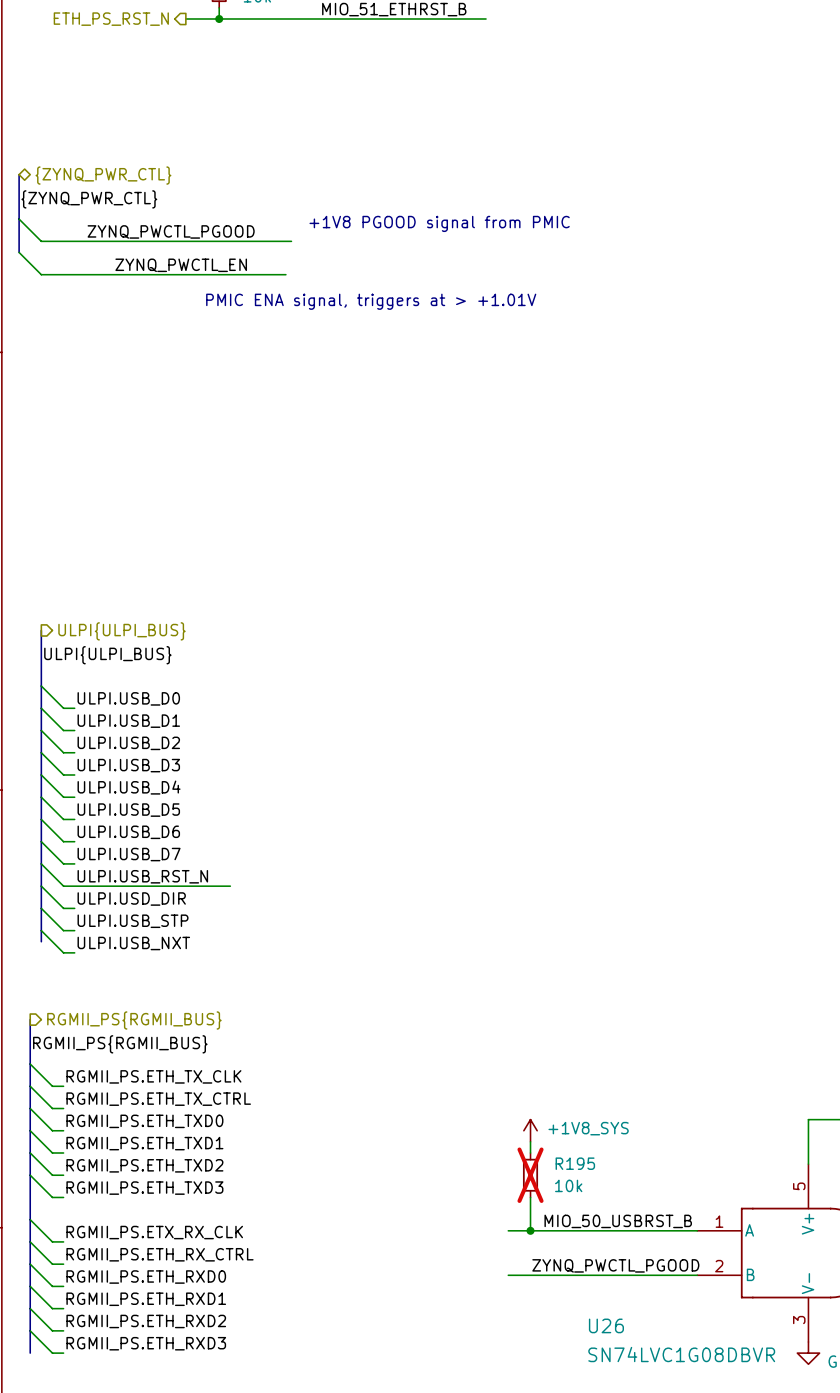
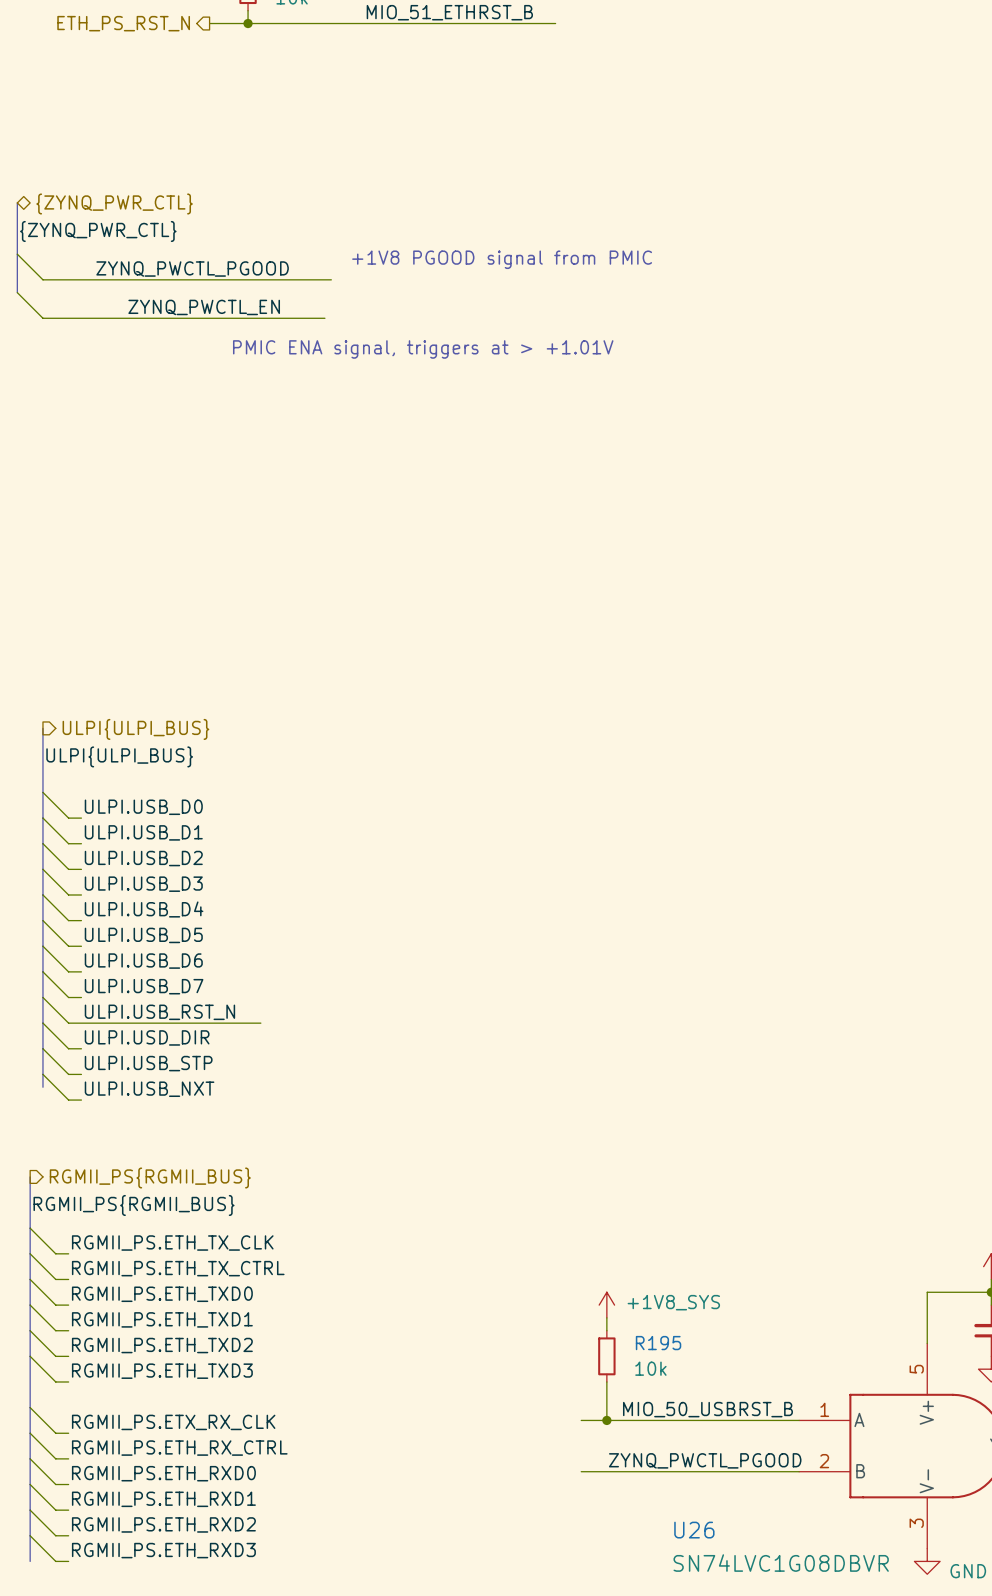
R195 do-not-place cross: (530, 1175) -> none

